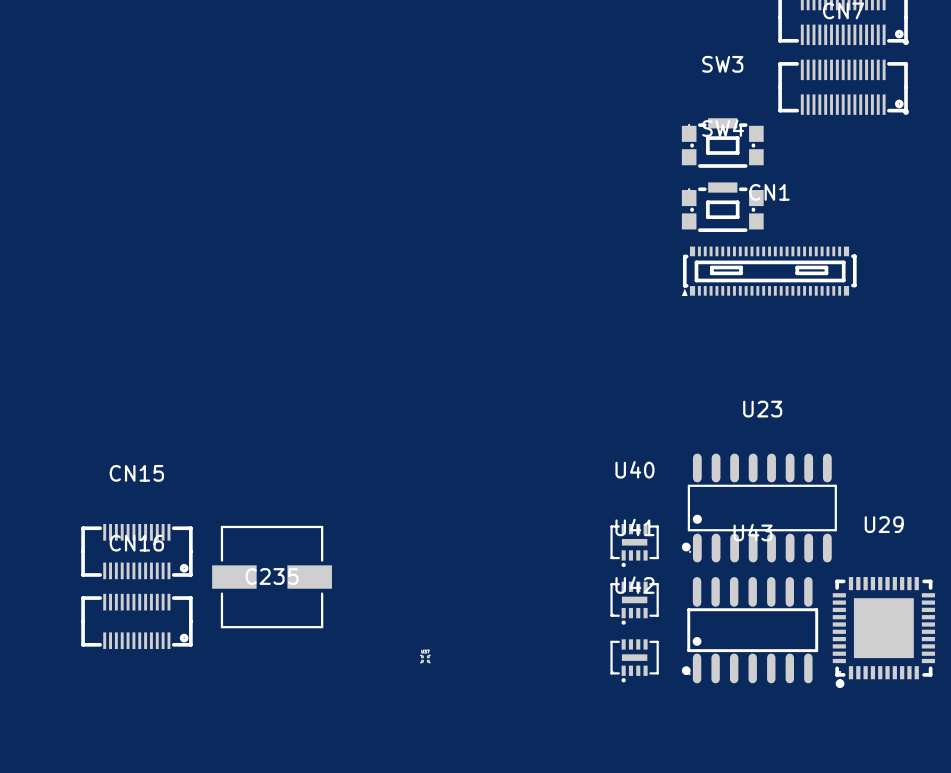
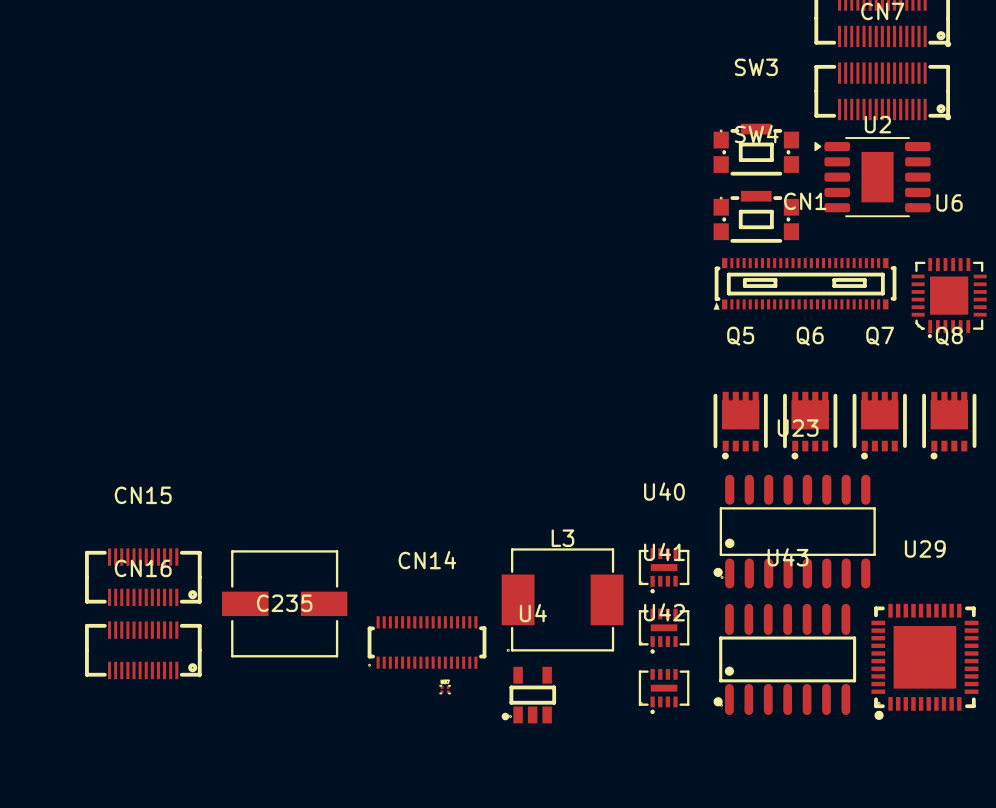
U2: none -> (872, 177)
U6: none -> (949, 298)
Q5: none -> (740, 425)
Q6: none -> (810, 425)
Q7: none -> (879, 425)
Q8: none -> (949, 425)
L3: none -> (562, 599)
CN14: none -> (427, 642)
U4: none -> (528, 695)

